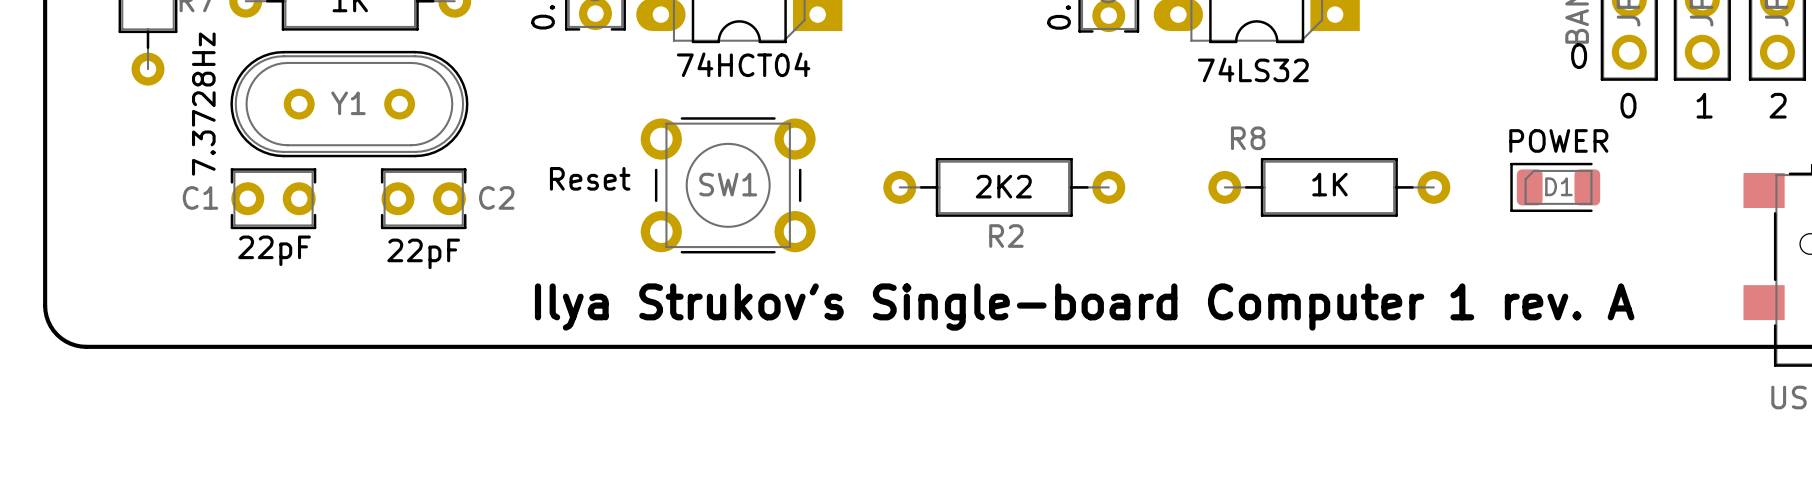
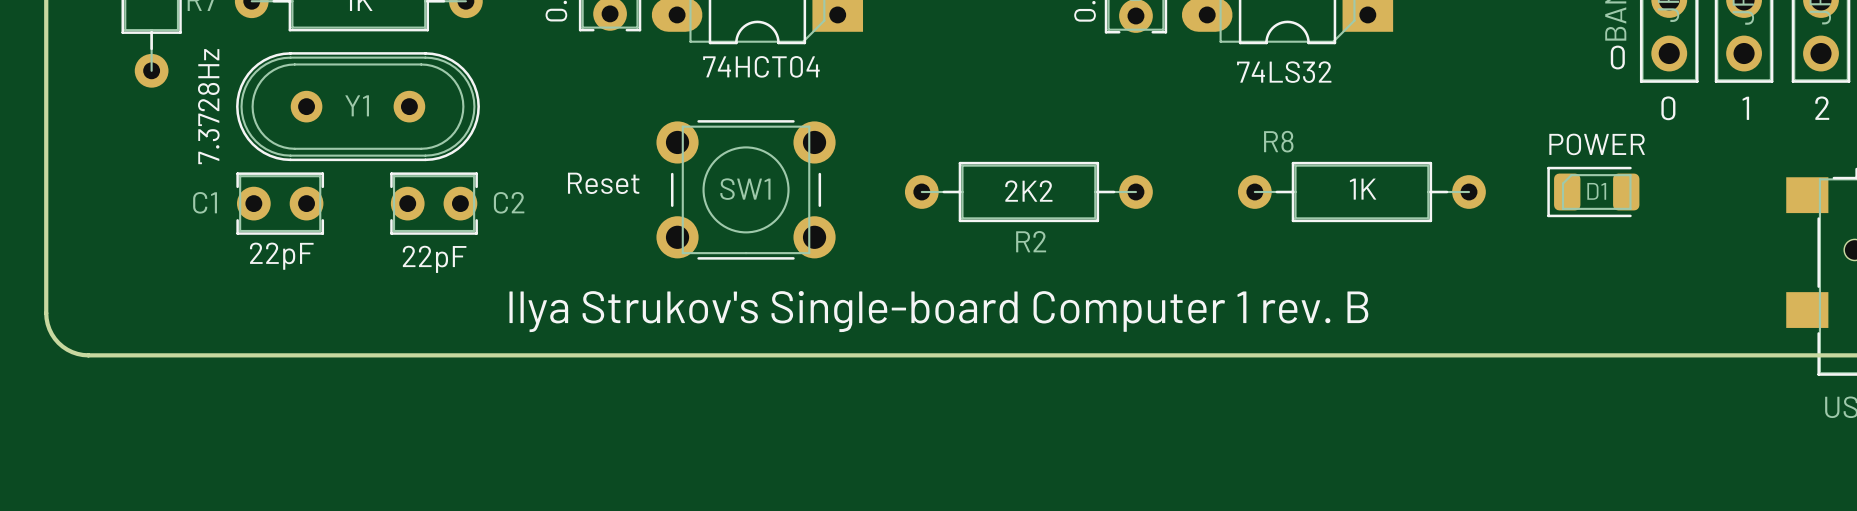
text: Ilya Strukov's Single-board Computer 1 rev. A (1084, 307) -> Ilya Strukov's Single-board Computer 1 rev. B (938, 311)

